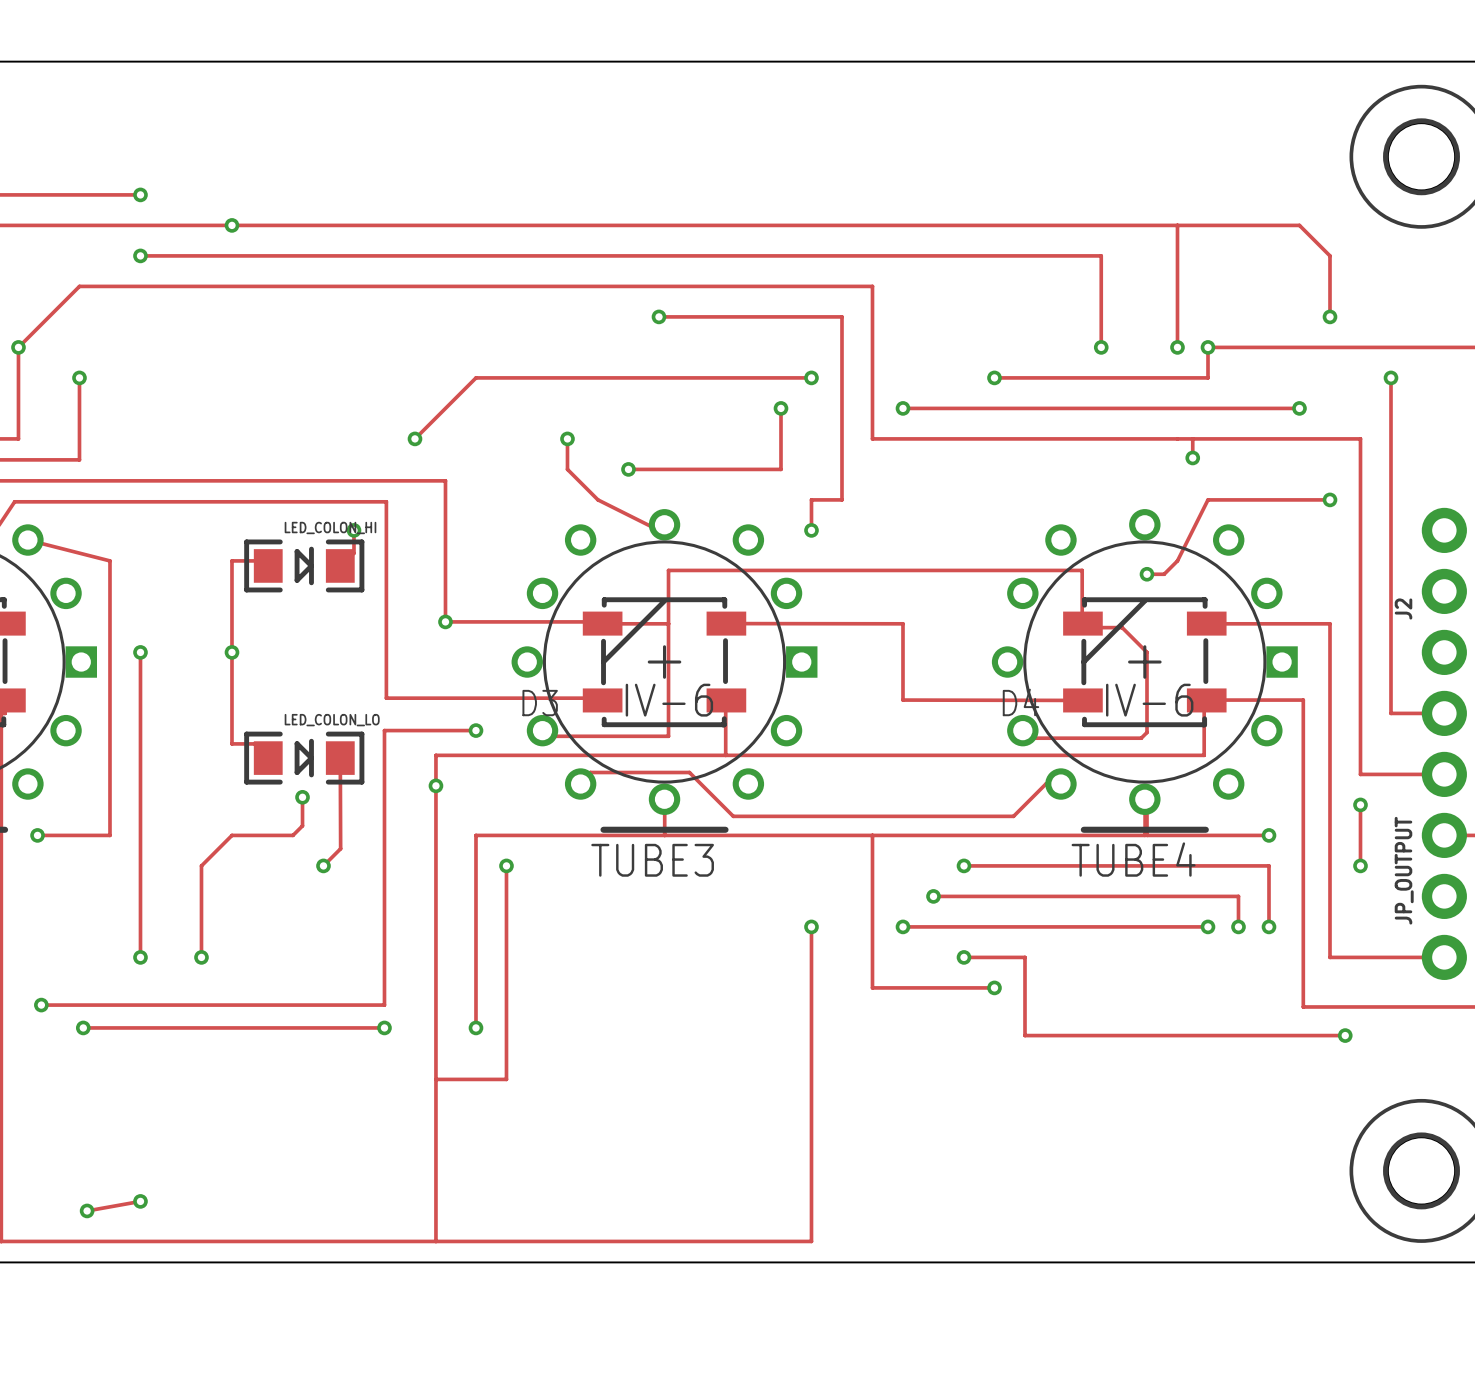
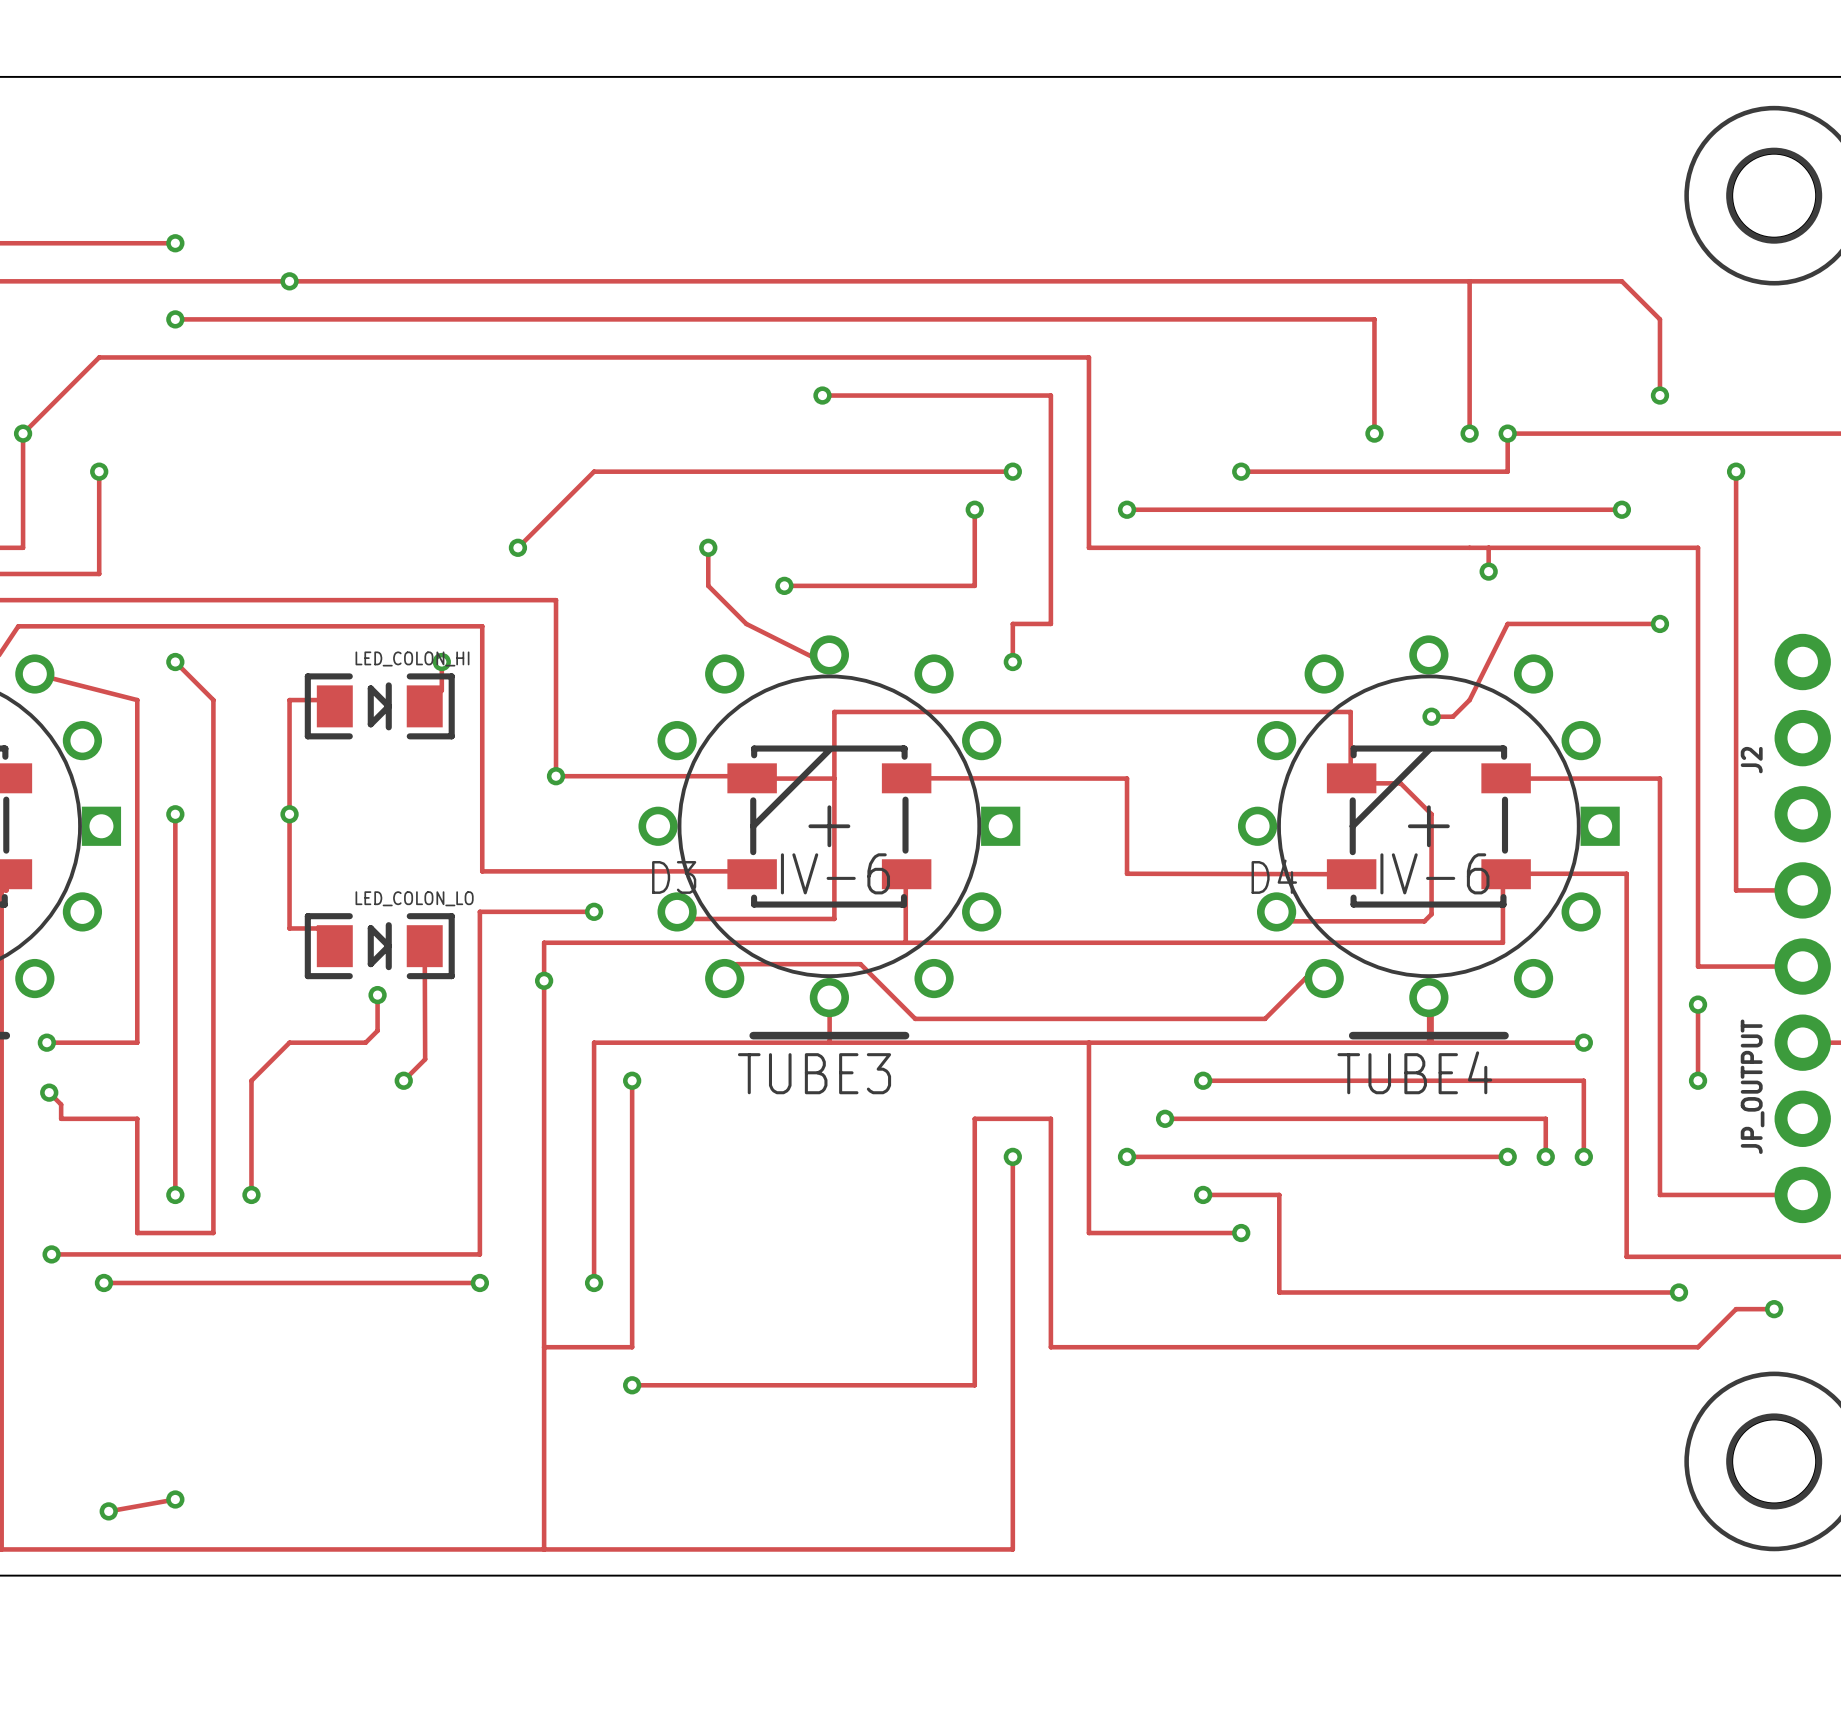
track: none -> (175, 662) (213, 700) (213, 1233) (137, 1233) (137, 1118) (61, 1118) (61, 1104) (49, 1092)
via: none -> (175, 662)
via: none -> (49, 1092)
track: none -> (1774, 1309) (1736, 1309) (1698, 1347) (1050, 1347) (1050, 1118) (974, 1118) (974, 1385) (632, 1385)
via: none -> (1774, 1309)
via: none -> (632, 1385)

